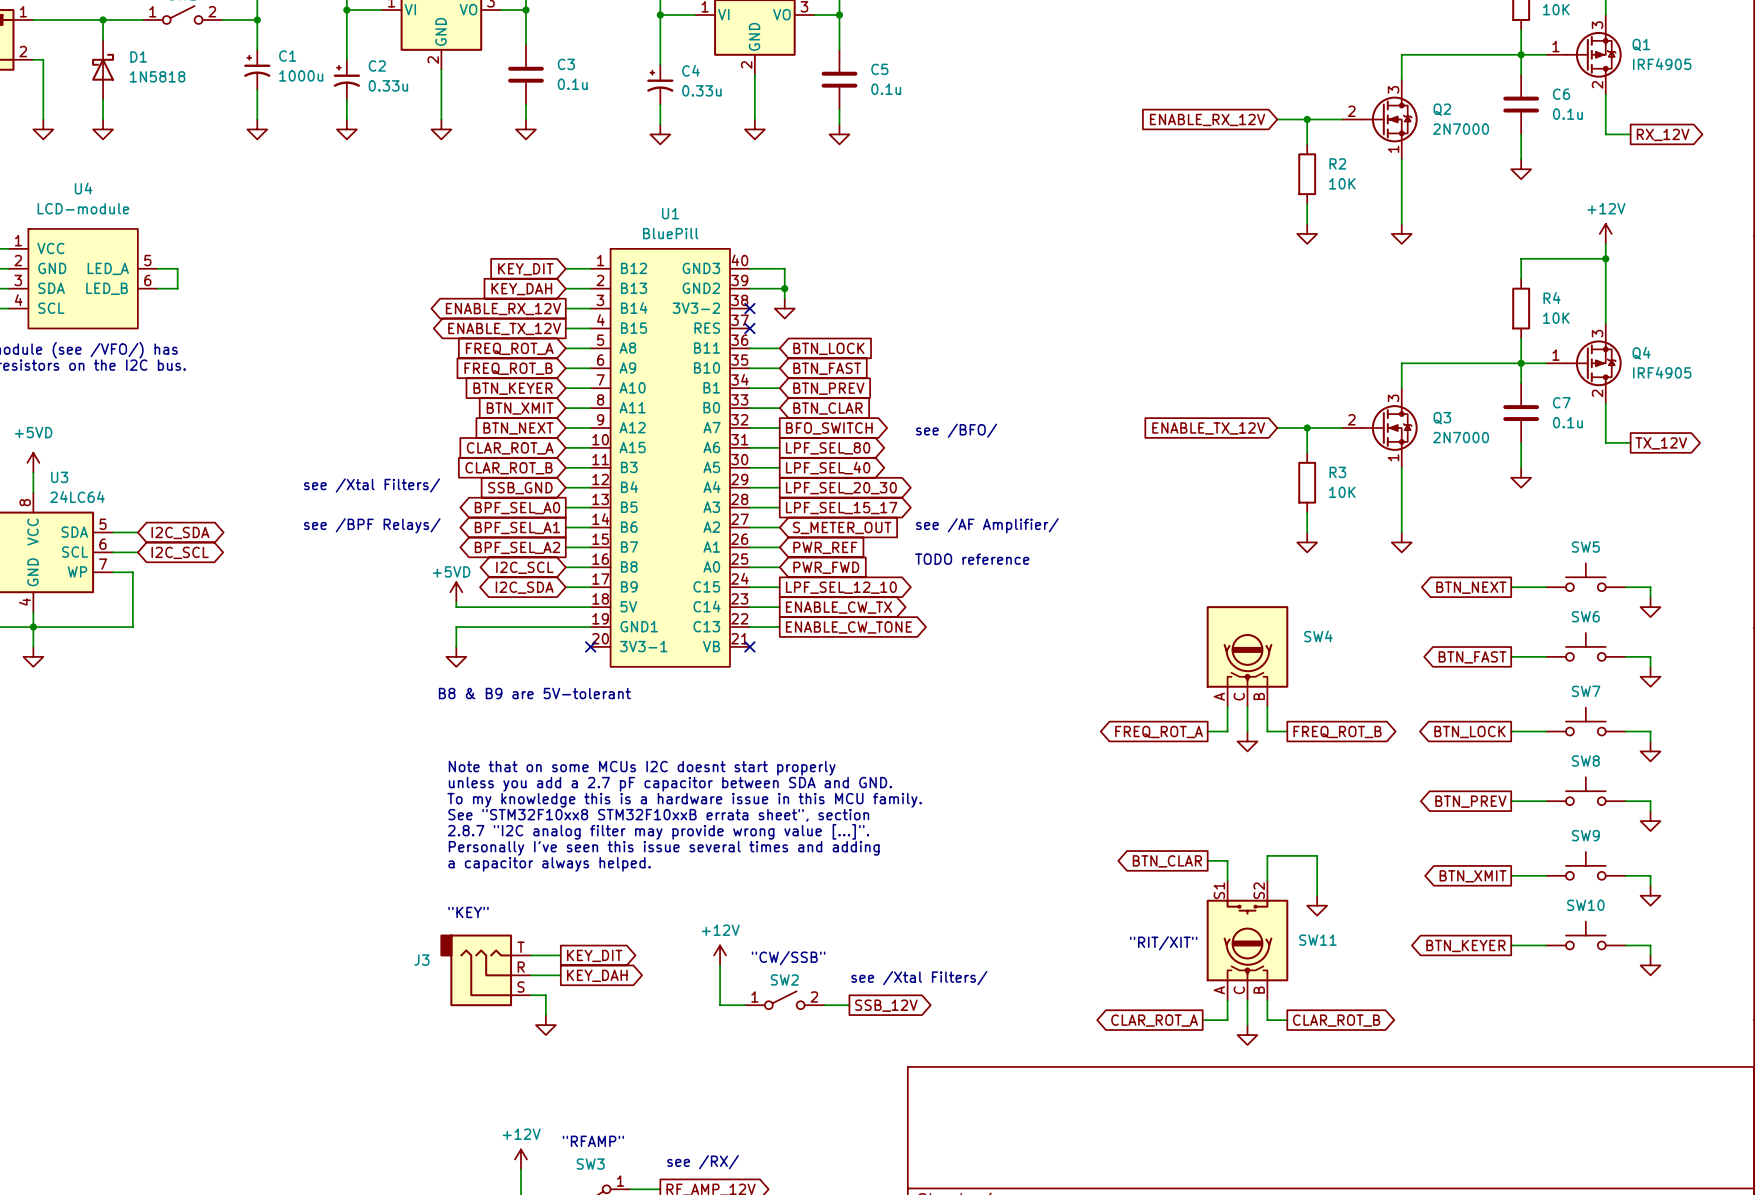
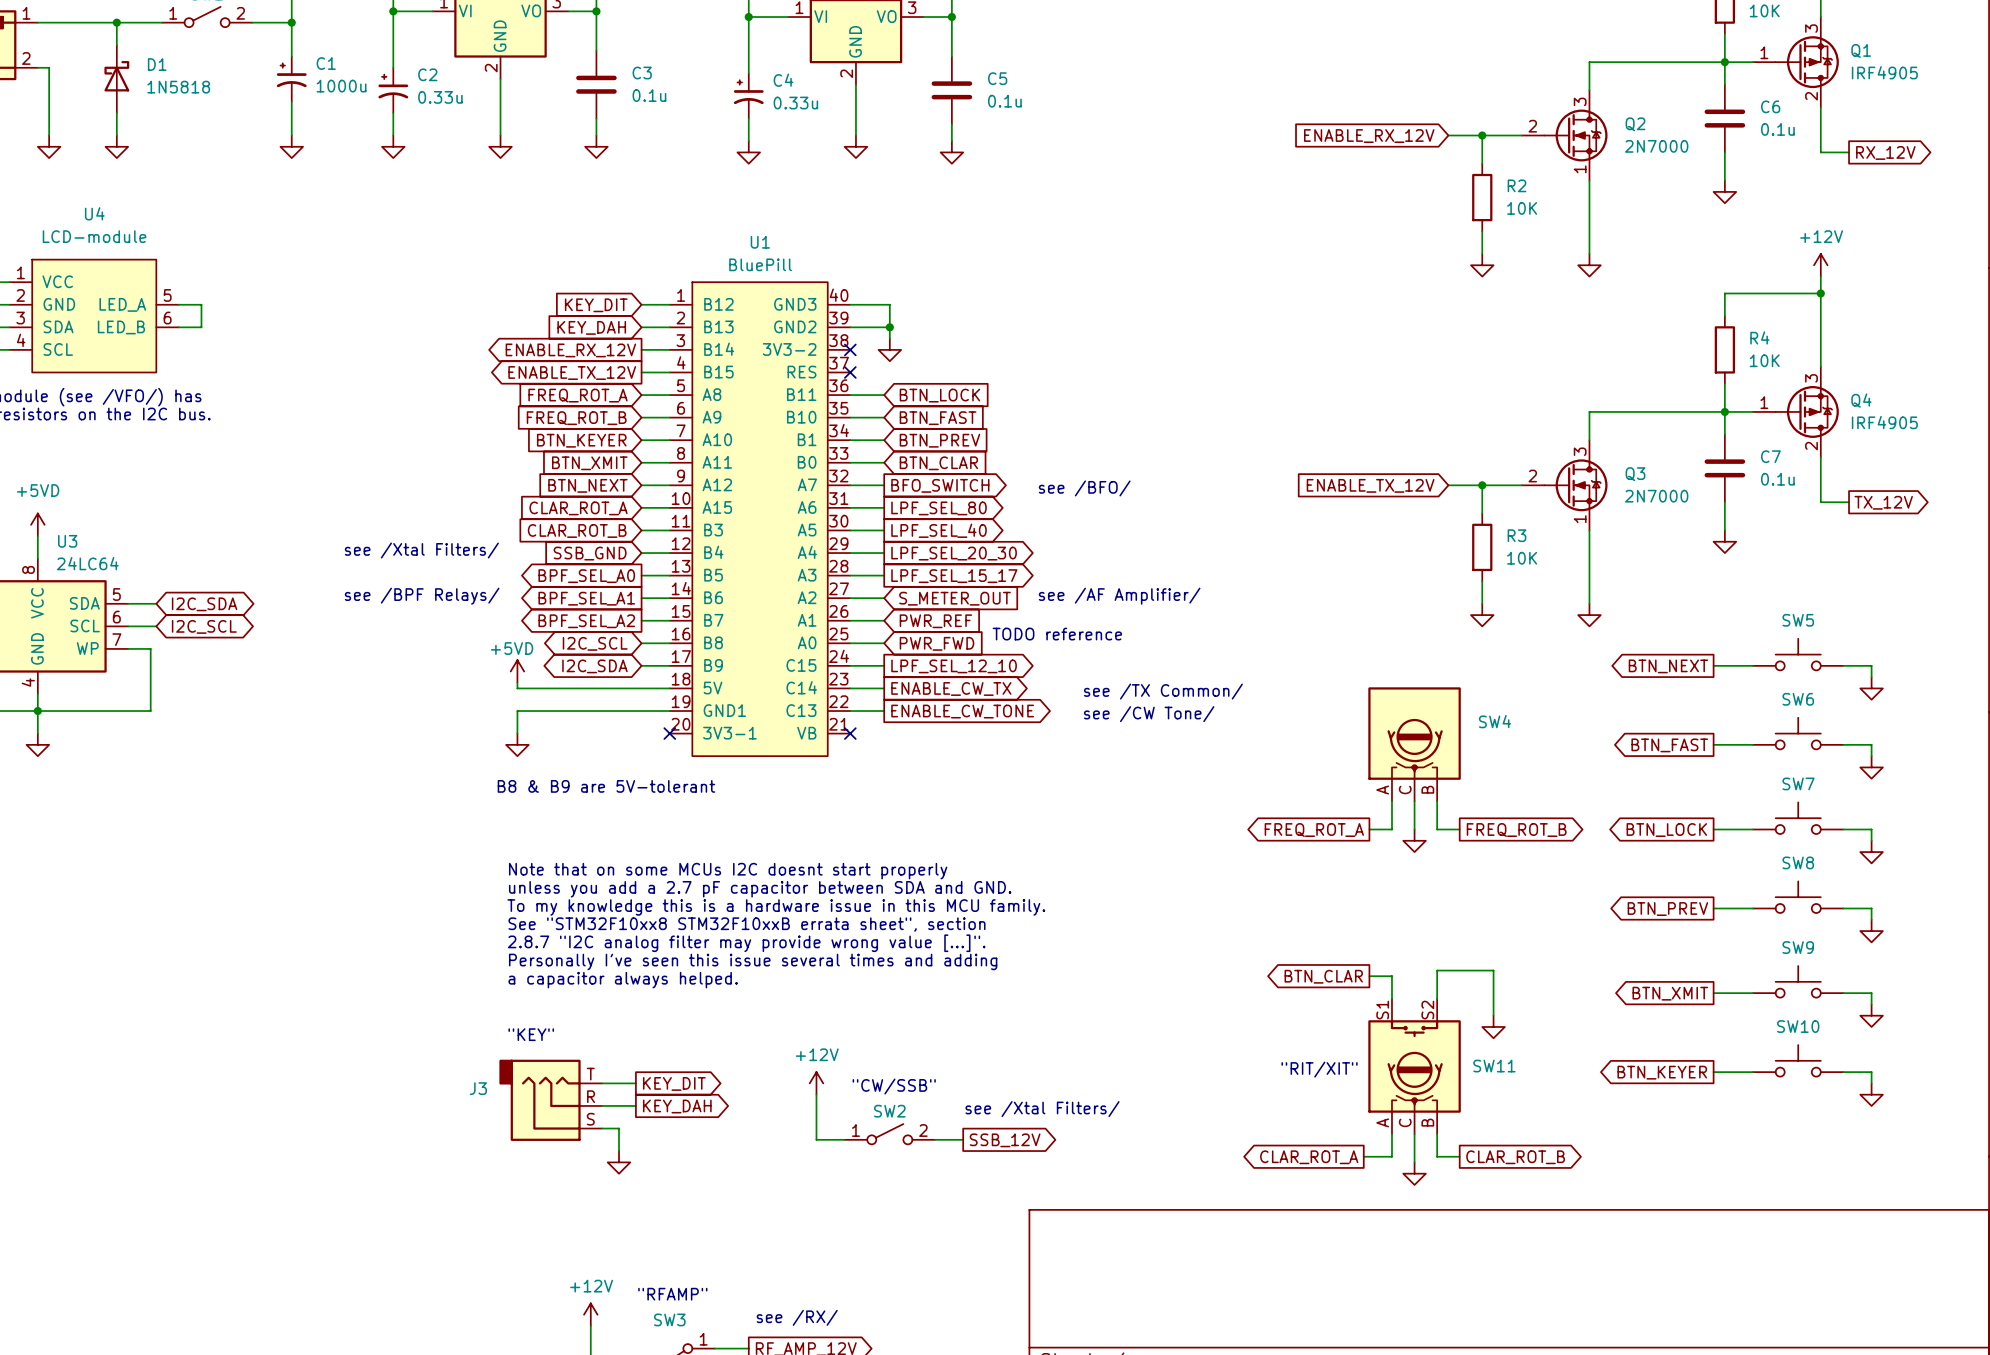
text position: TODO reference (972, 559) -> TODO reference (1057, 634)
text: none -> see /TX Common/ (1163, 691)
text: none -> see /CW Tone/ (1149, 714)

